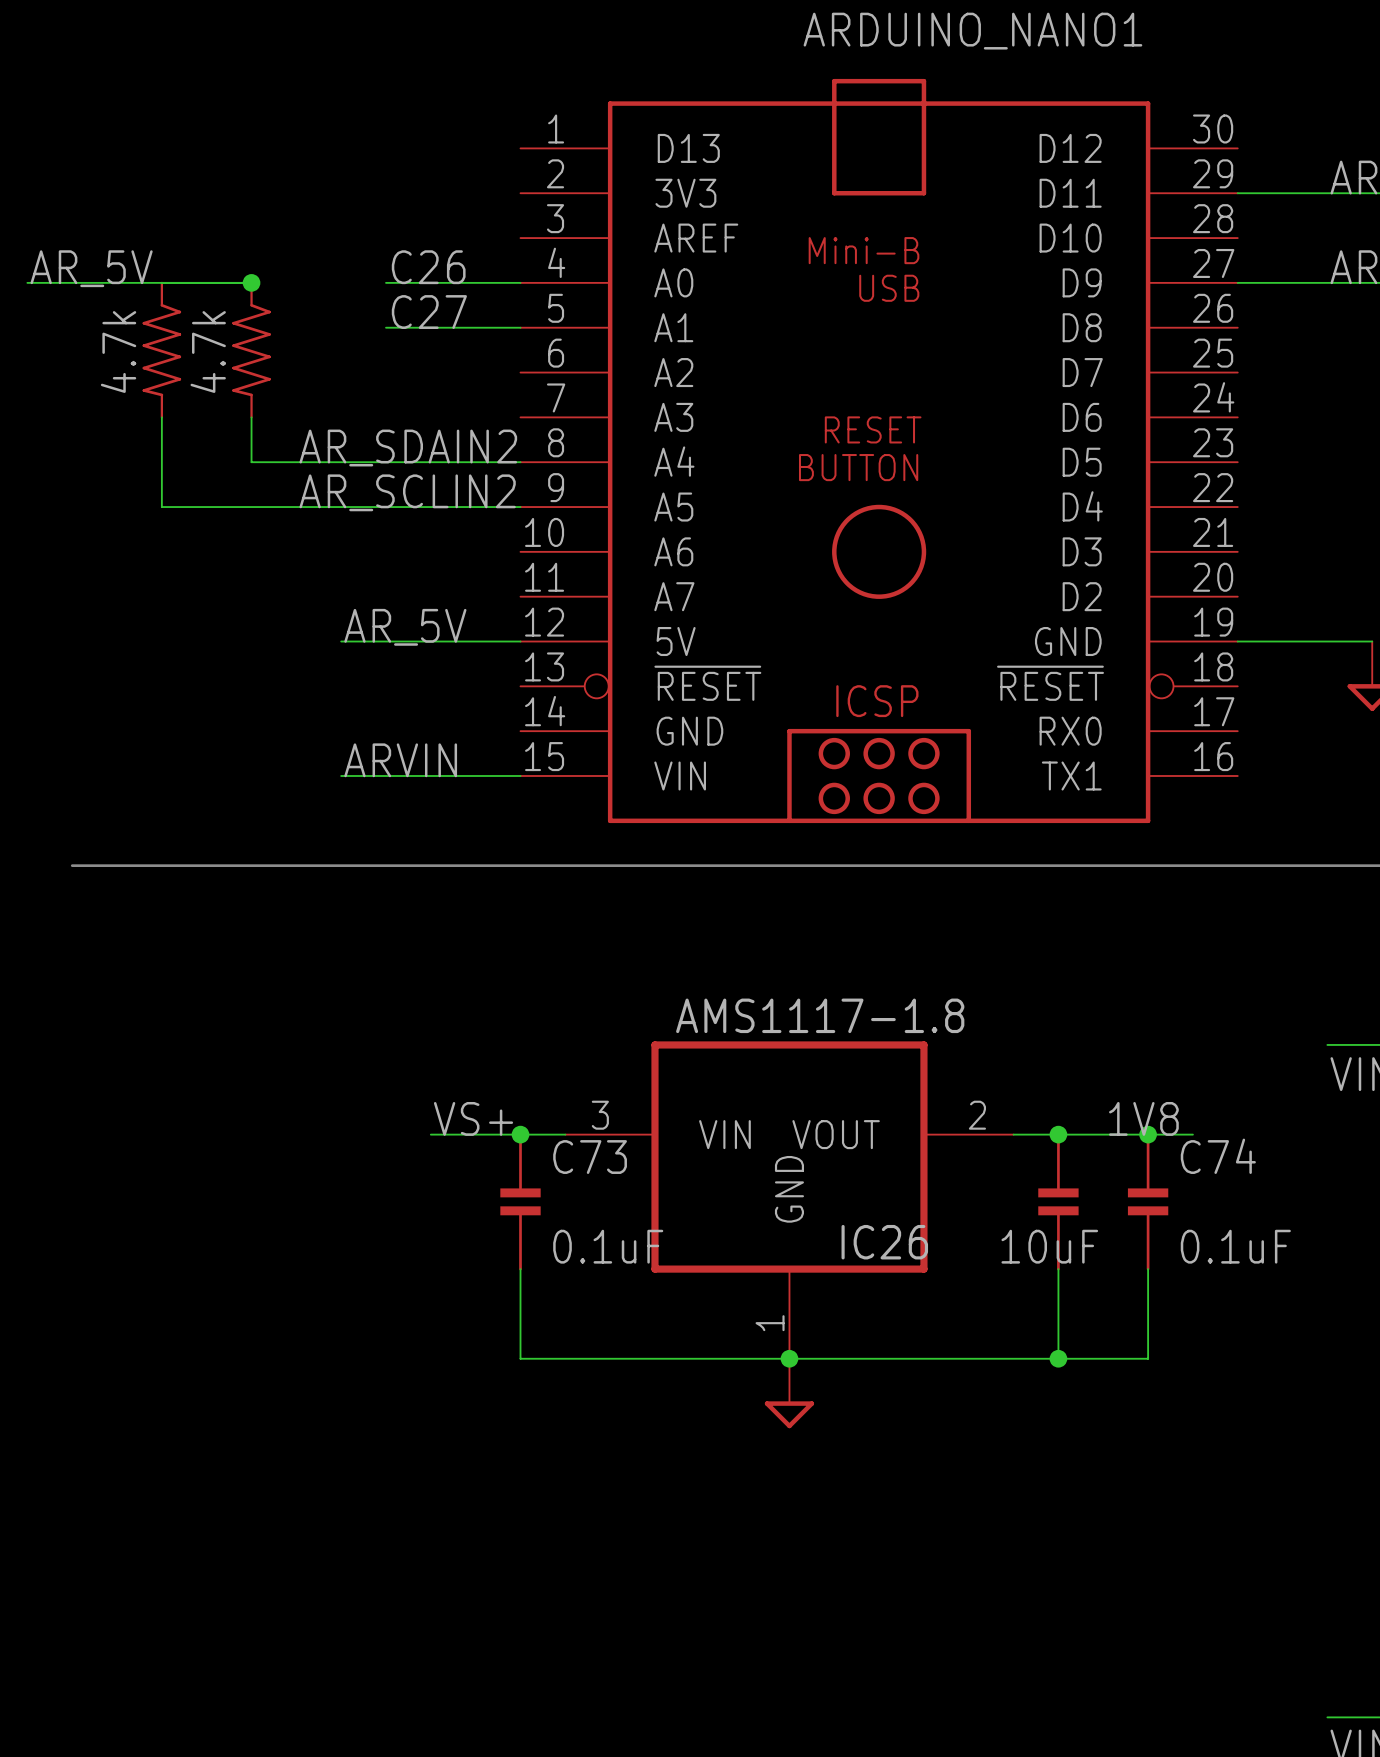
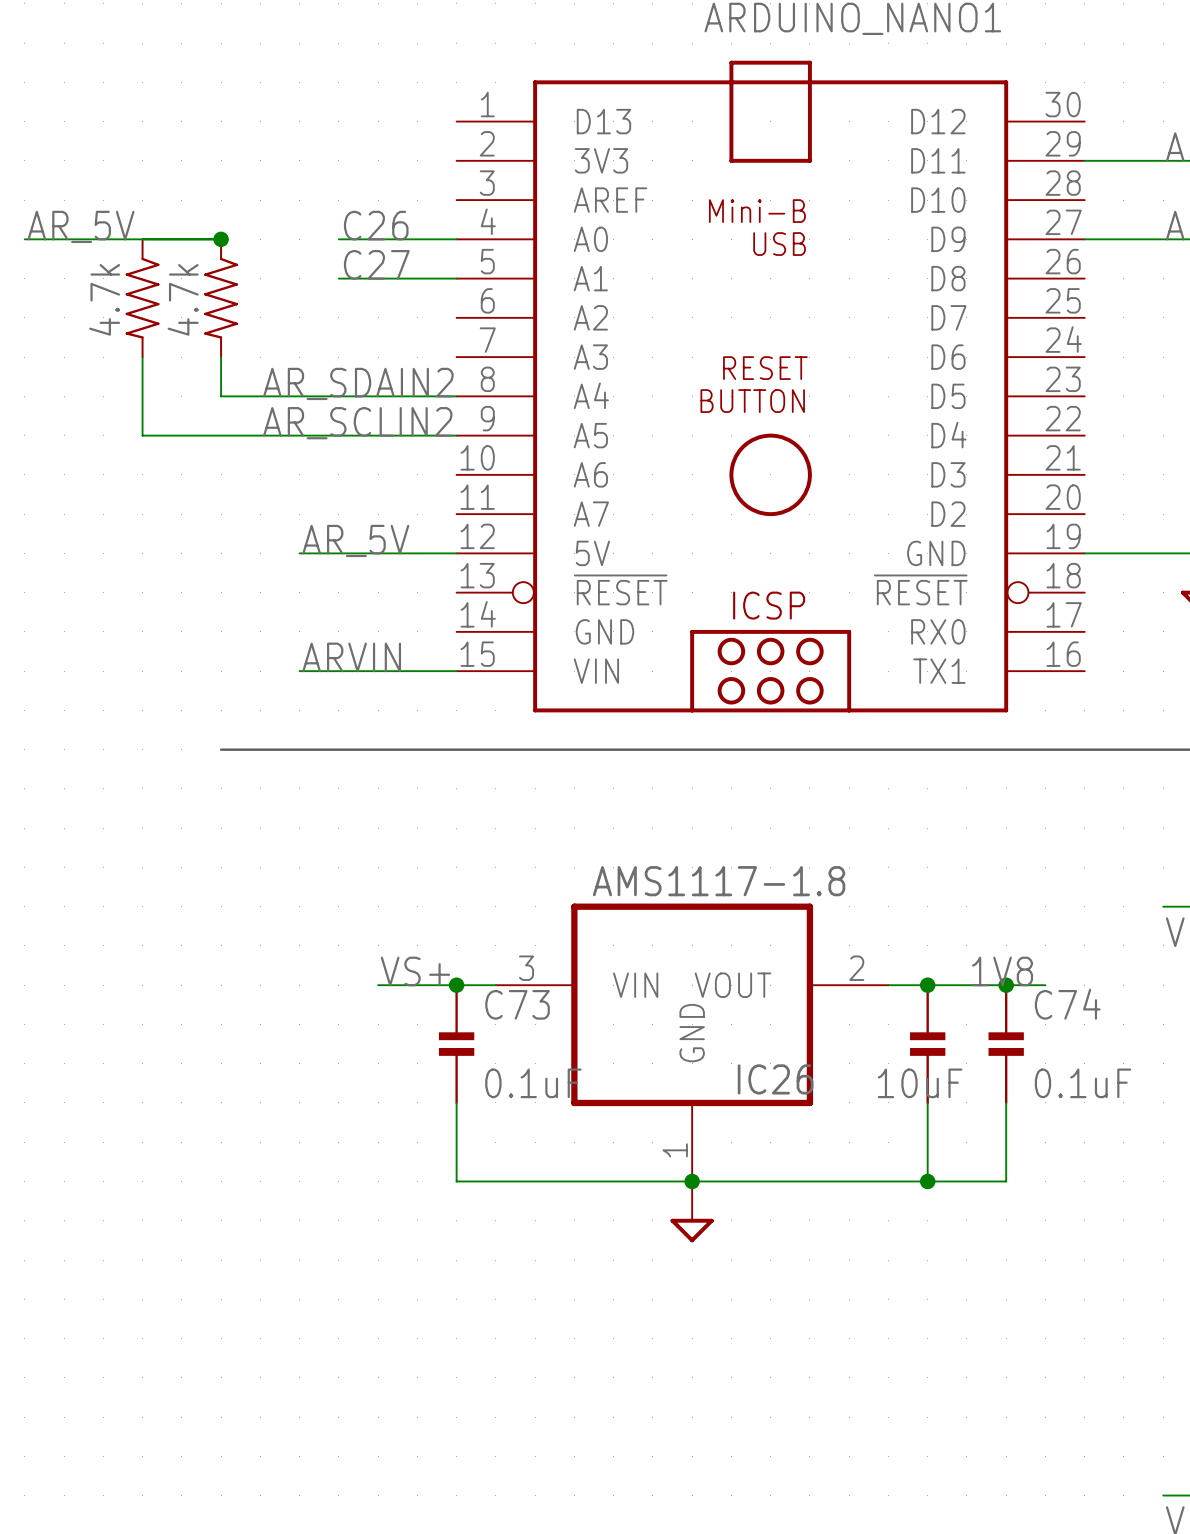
line: (72, 865) (251, 865) -> none

